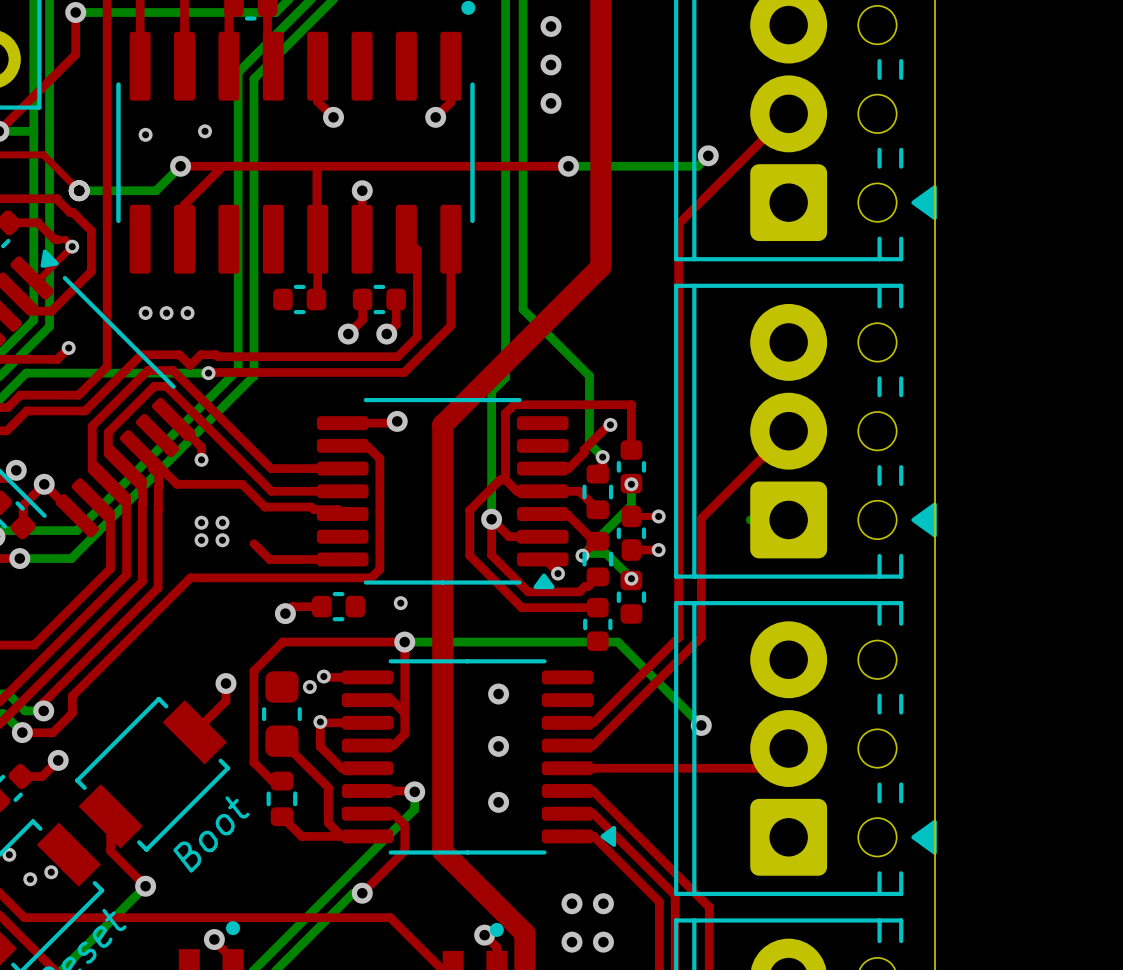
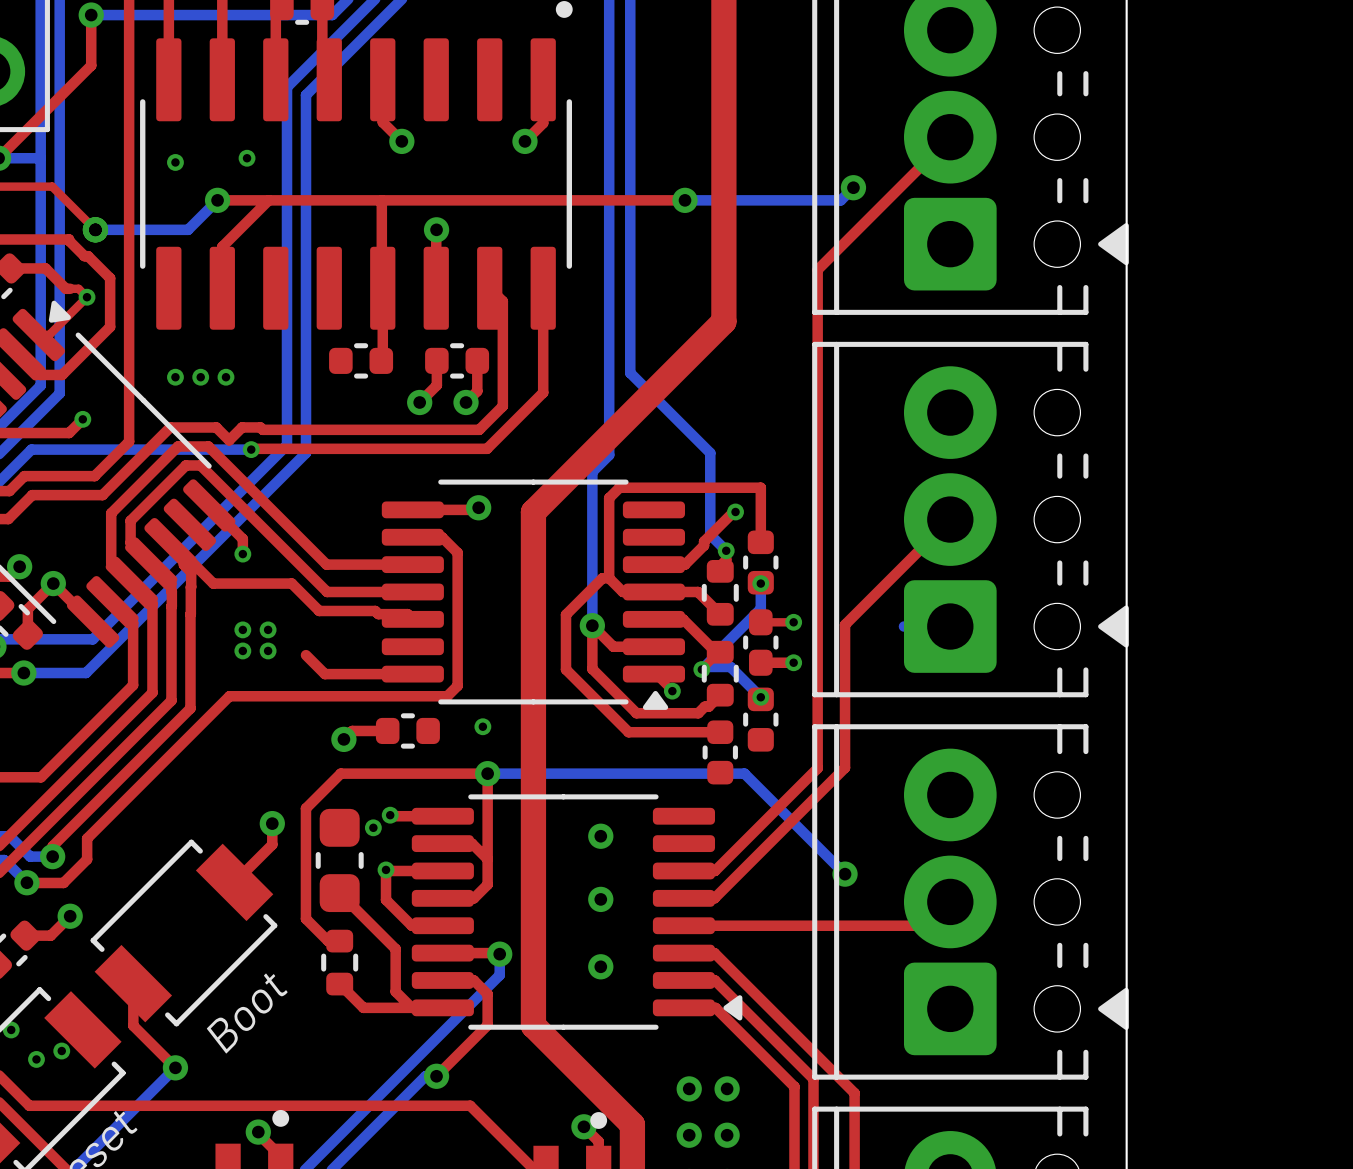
via: (551, 26) -> none
via: (551, 64) -> none
via: (551, 103) -> none

